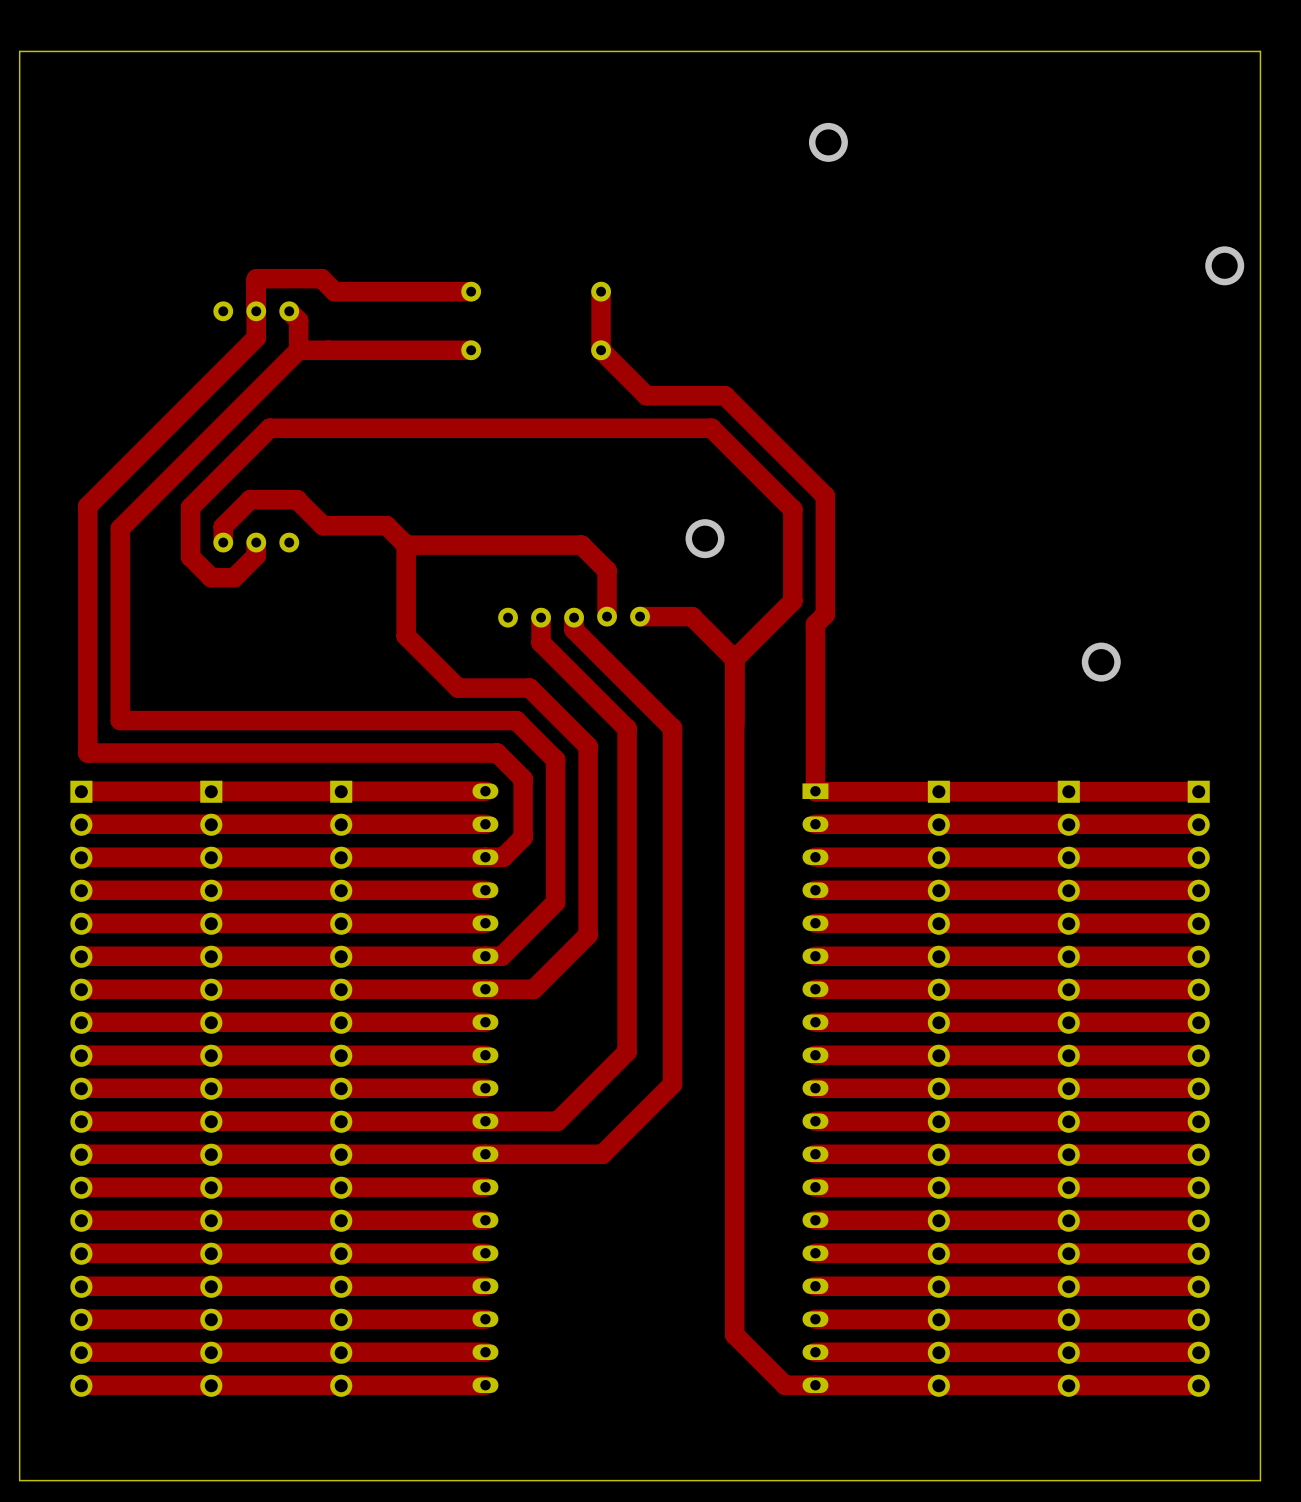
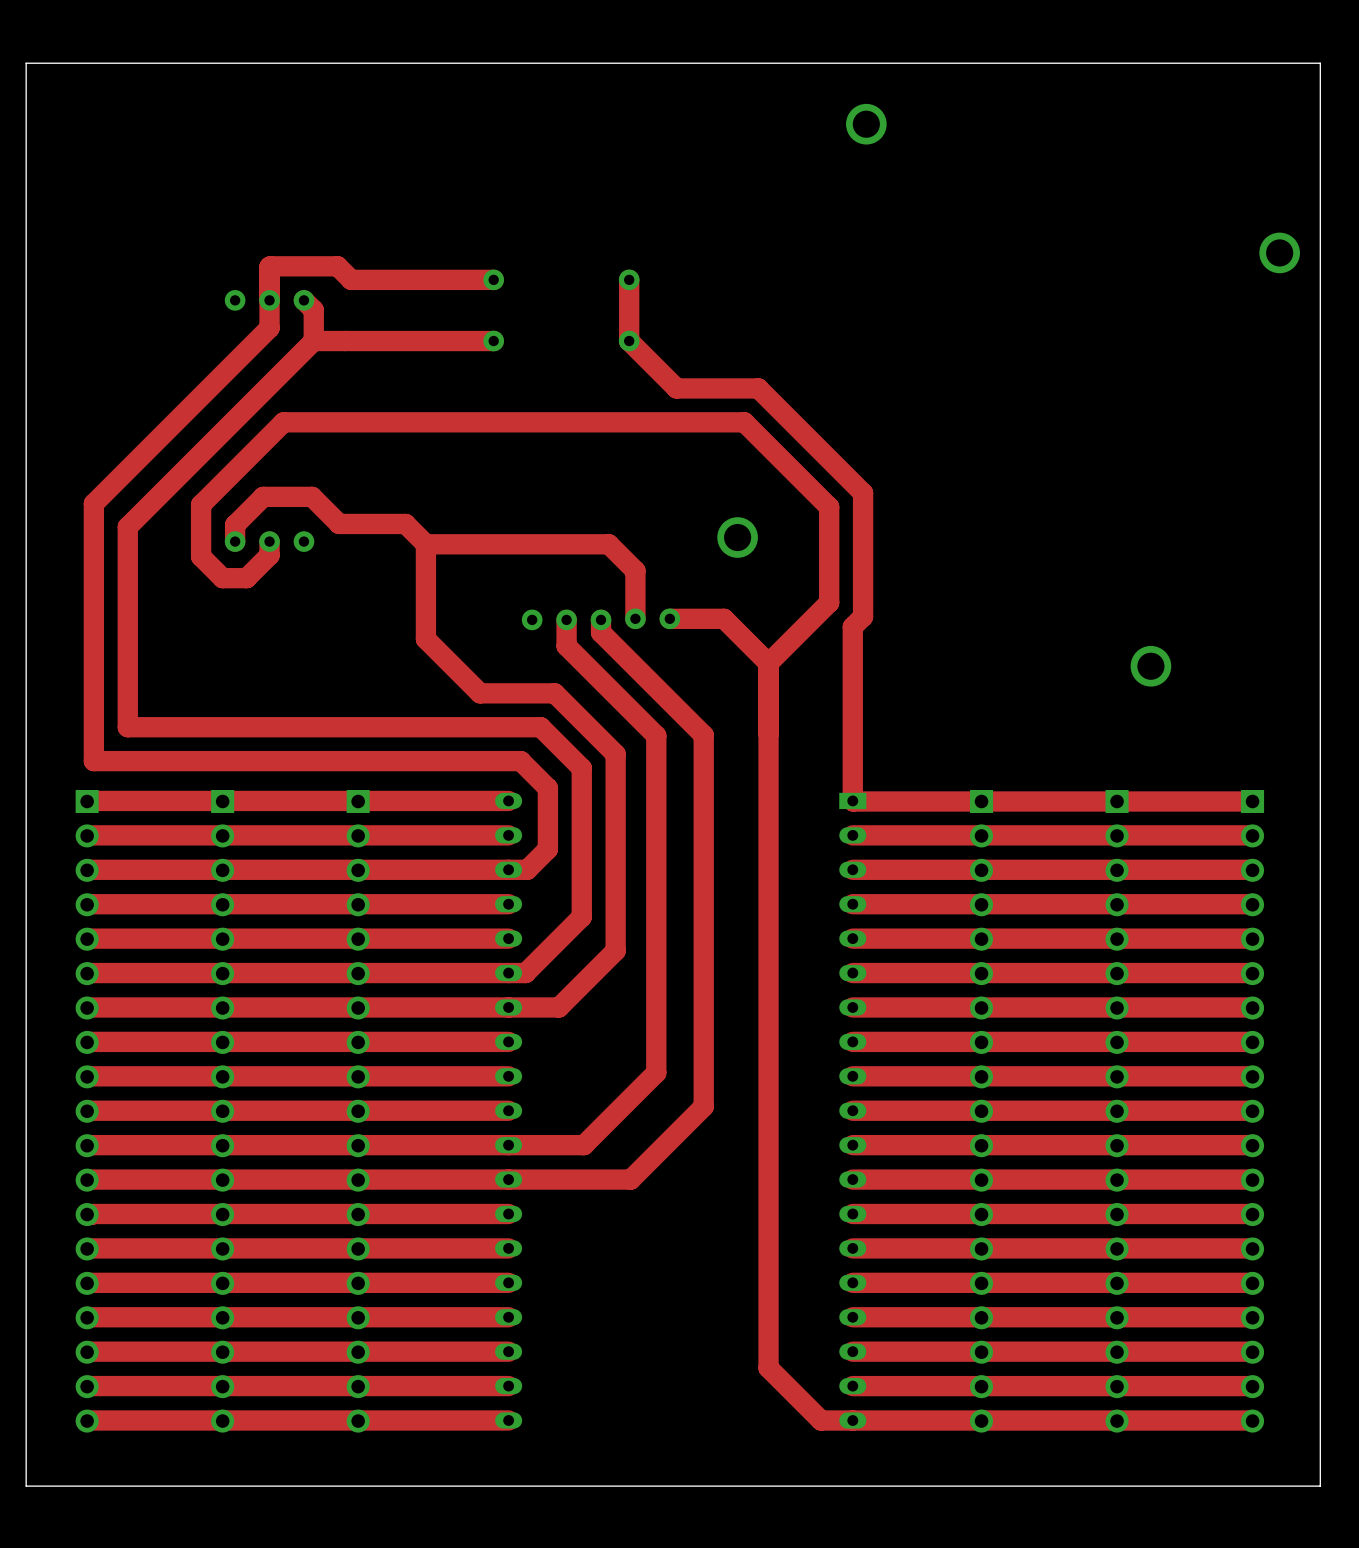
board edge: (1260, 51) (19, 51) (19, 1480) (1260, 1480) (1260, 51) -> (1320, 63) (1320, 1486) (26, 1486) (26, 63) (1320, 63)

